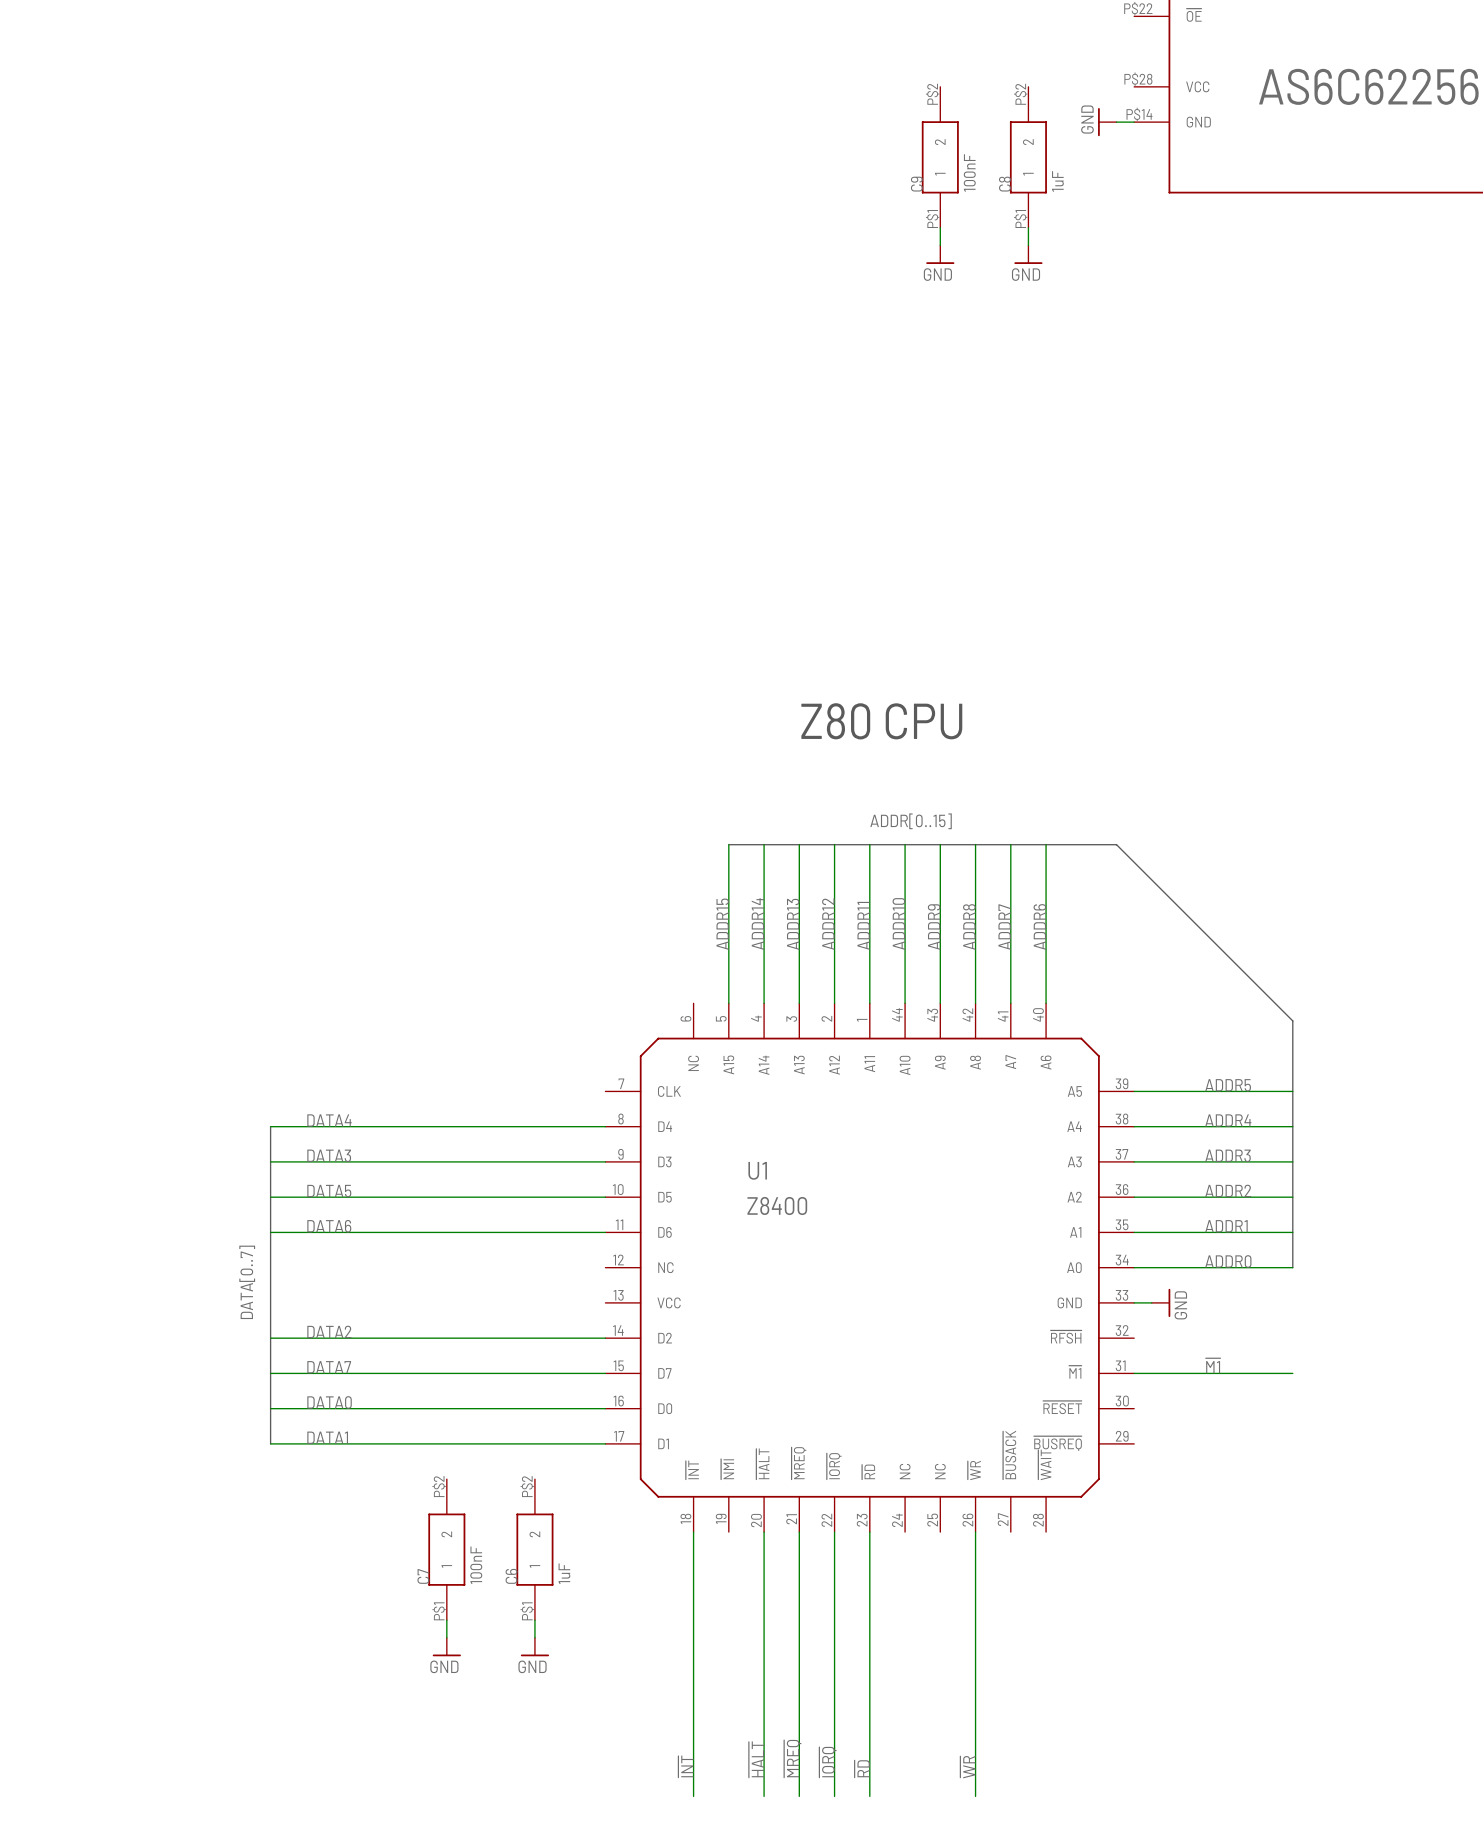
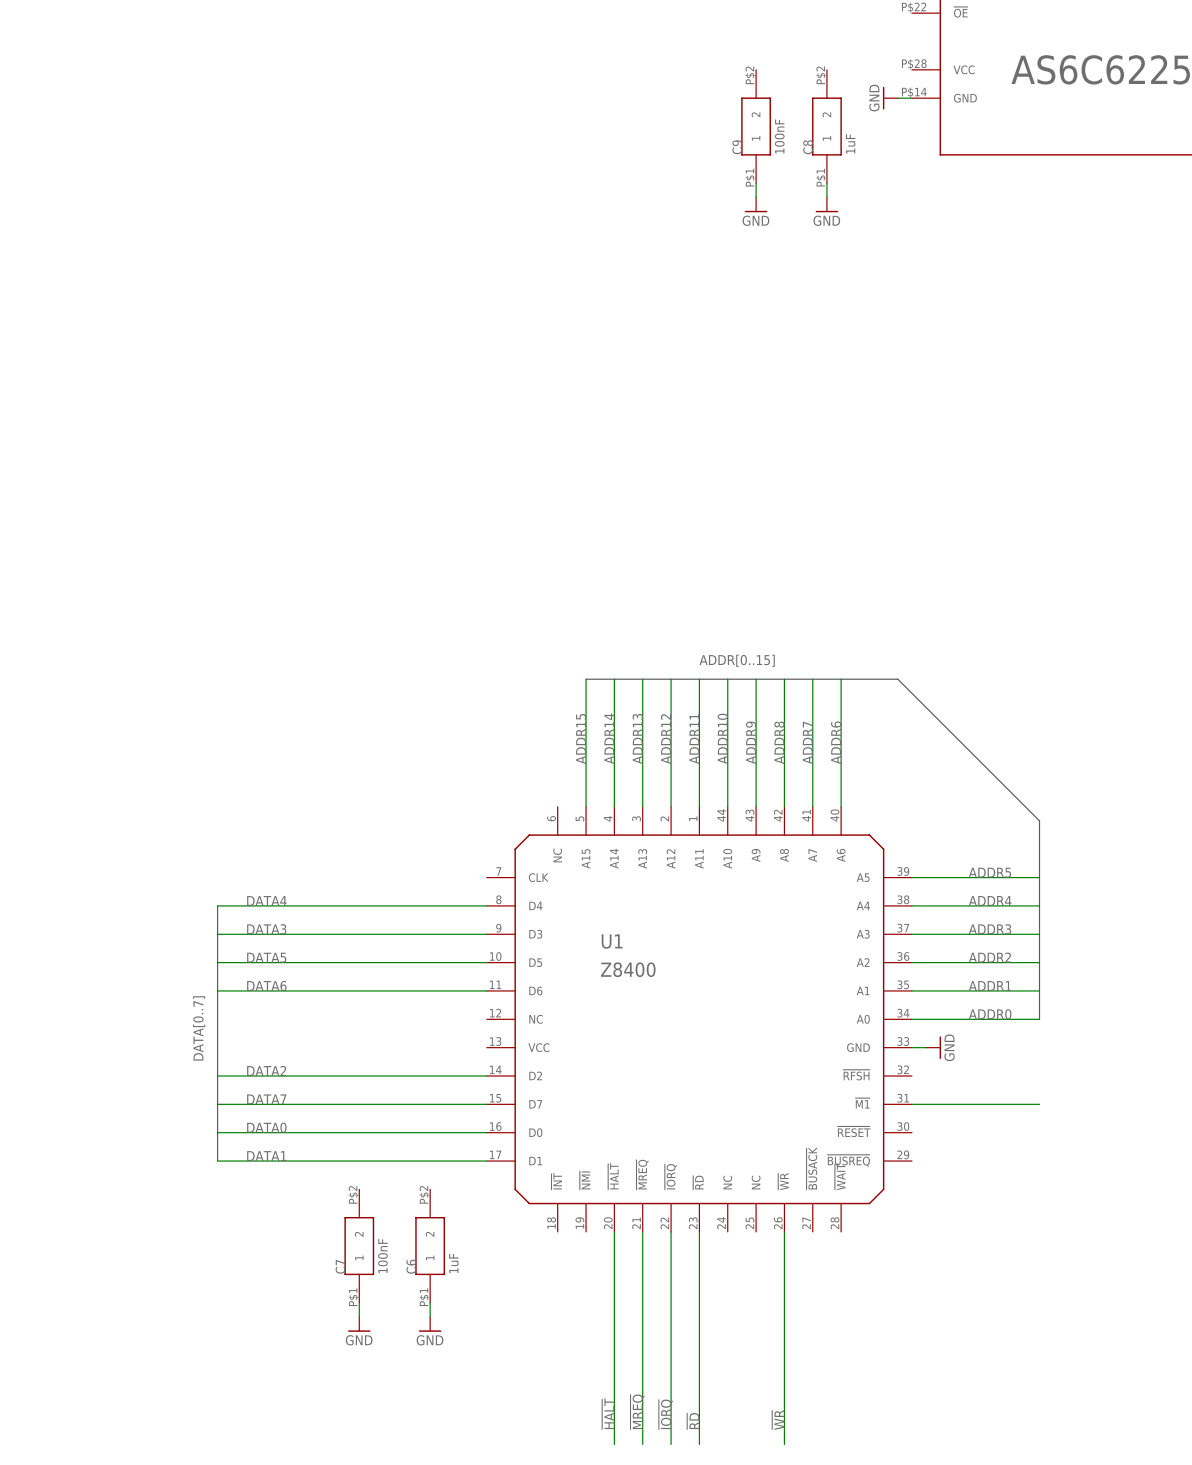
text: Z80 CPU (881, 721) -> none
label: ~{M1} (1213, 1365) -> none
wire: (693, 1532) (693, 1796) -> none
label: ~{INT} (685, 1766) -> none

